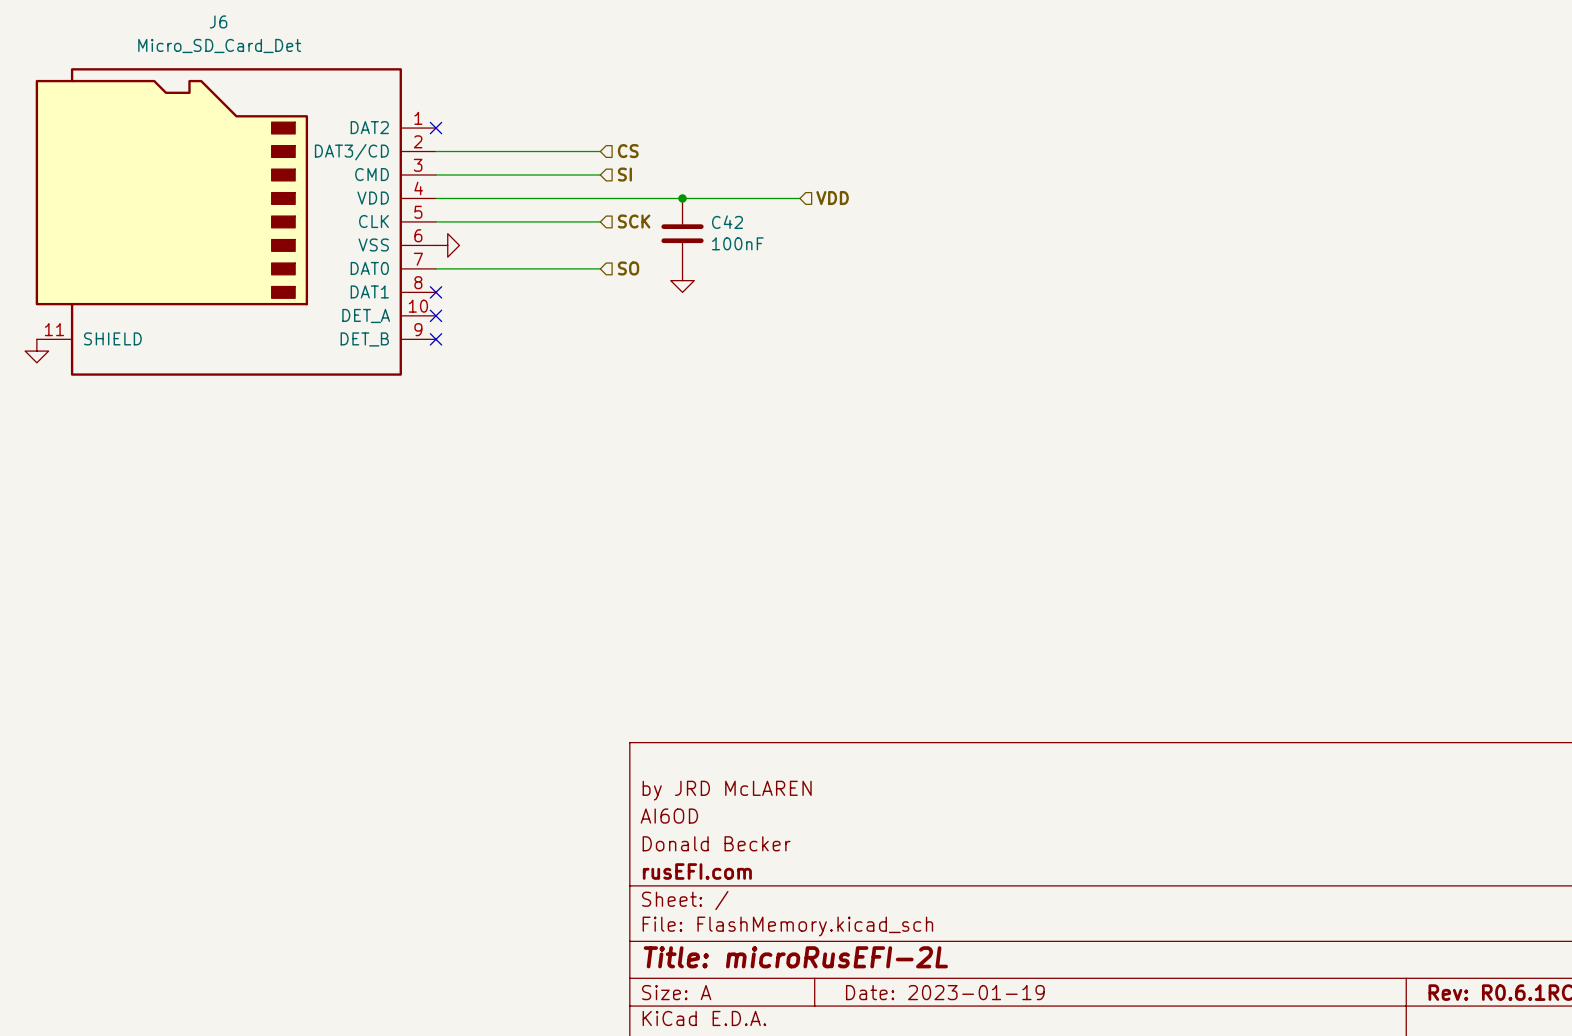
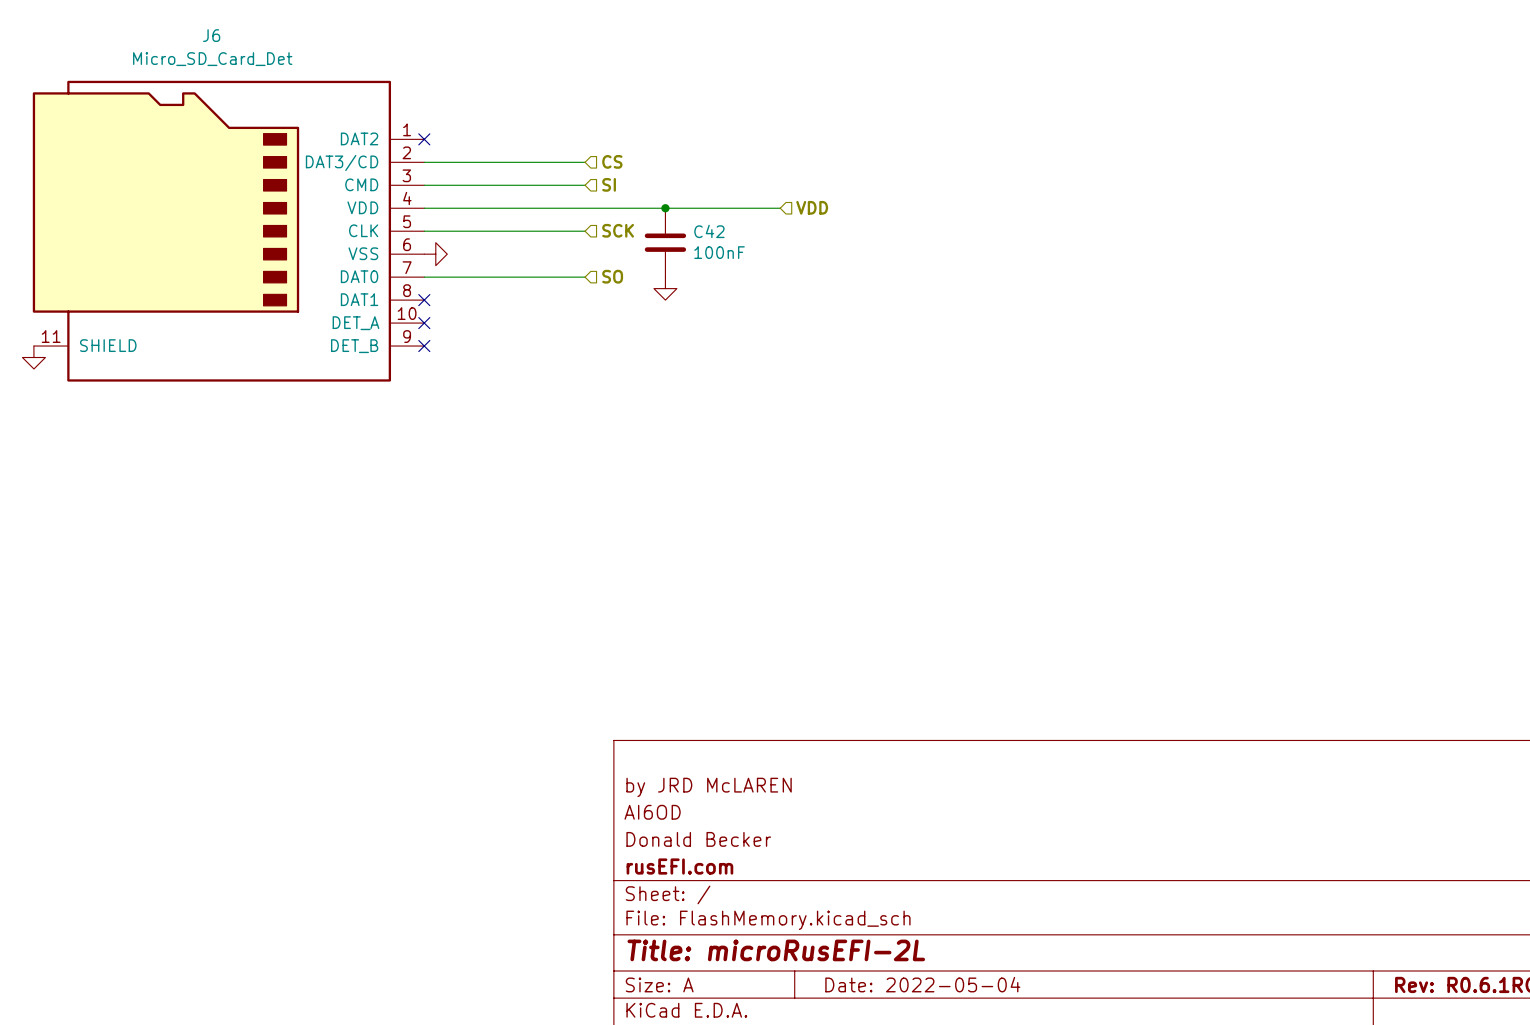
title block: Date: 2023-01-19 (945, 992) -> Date: 2022-05-04 (922, 984)

